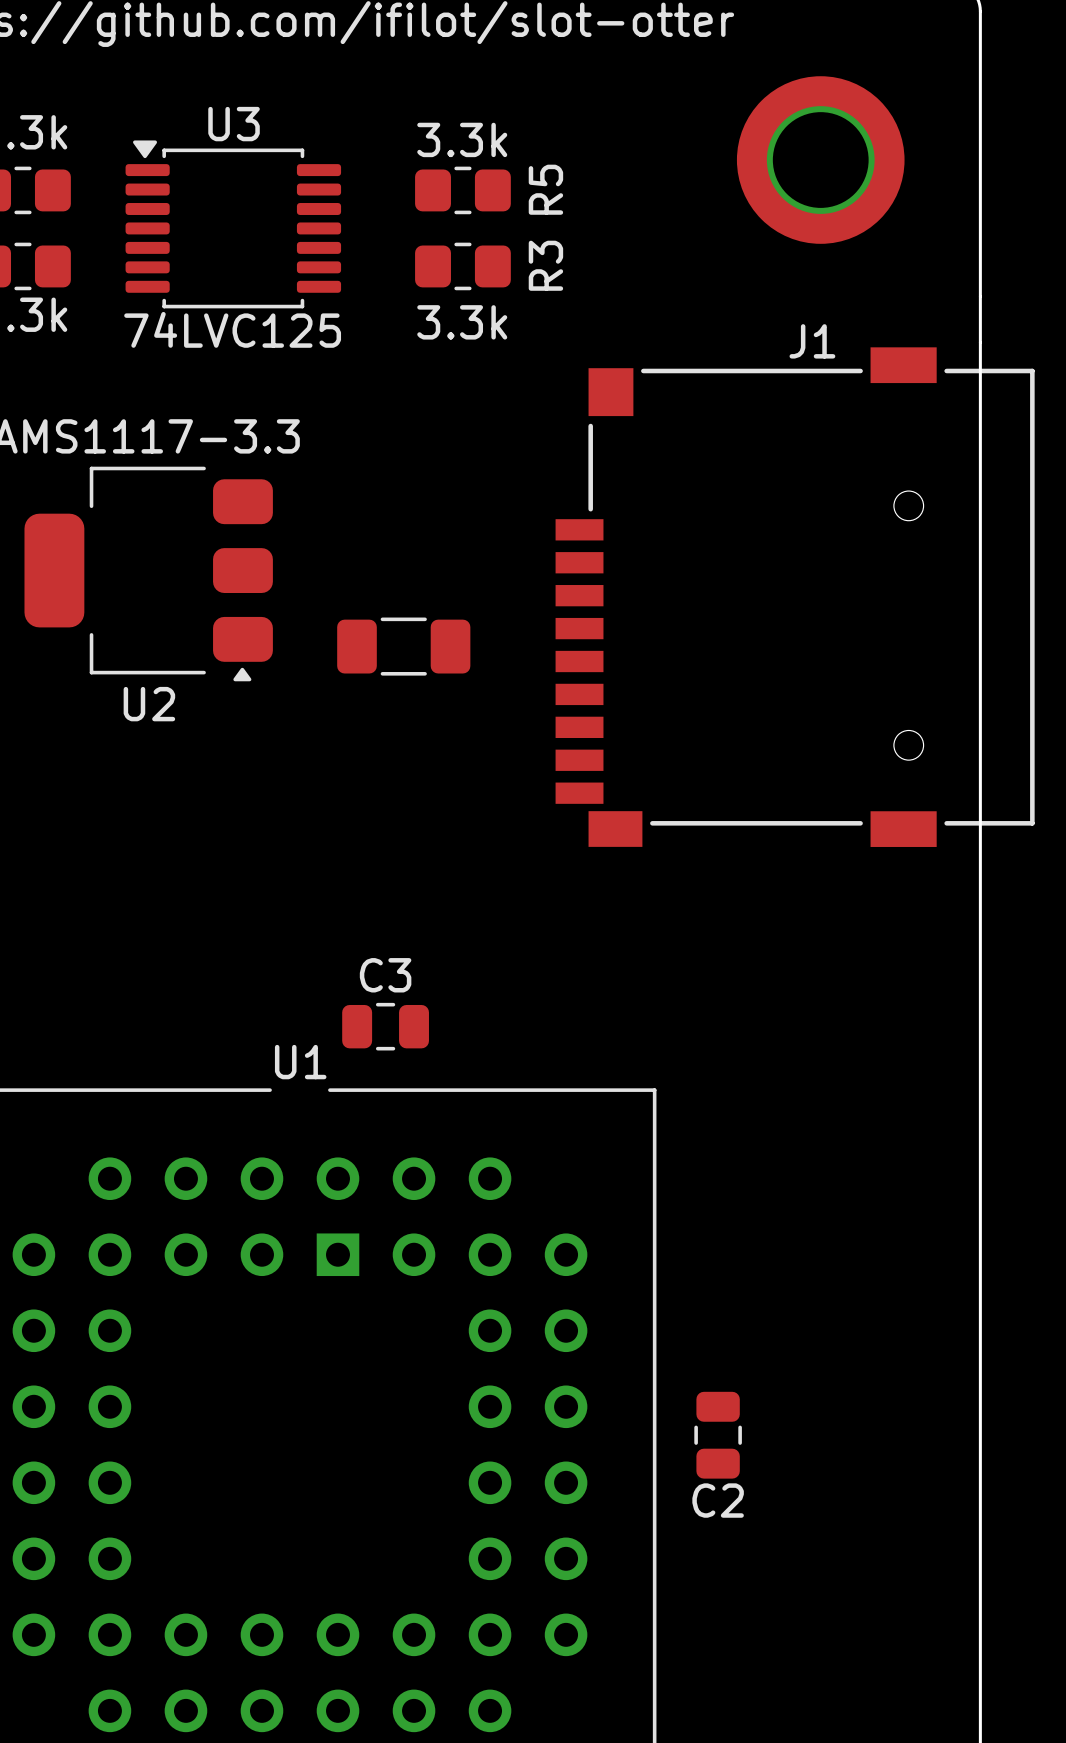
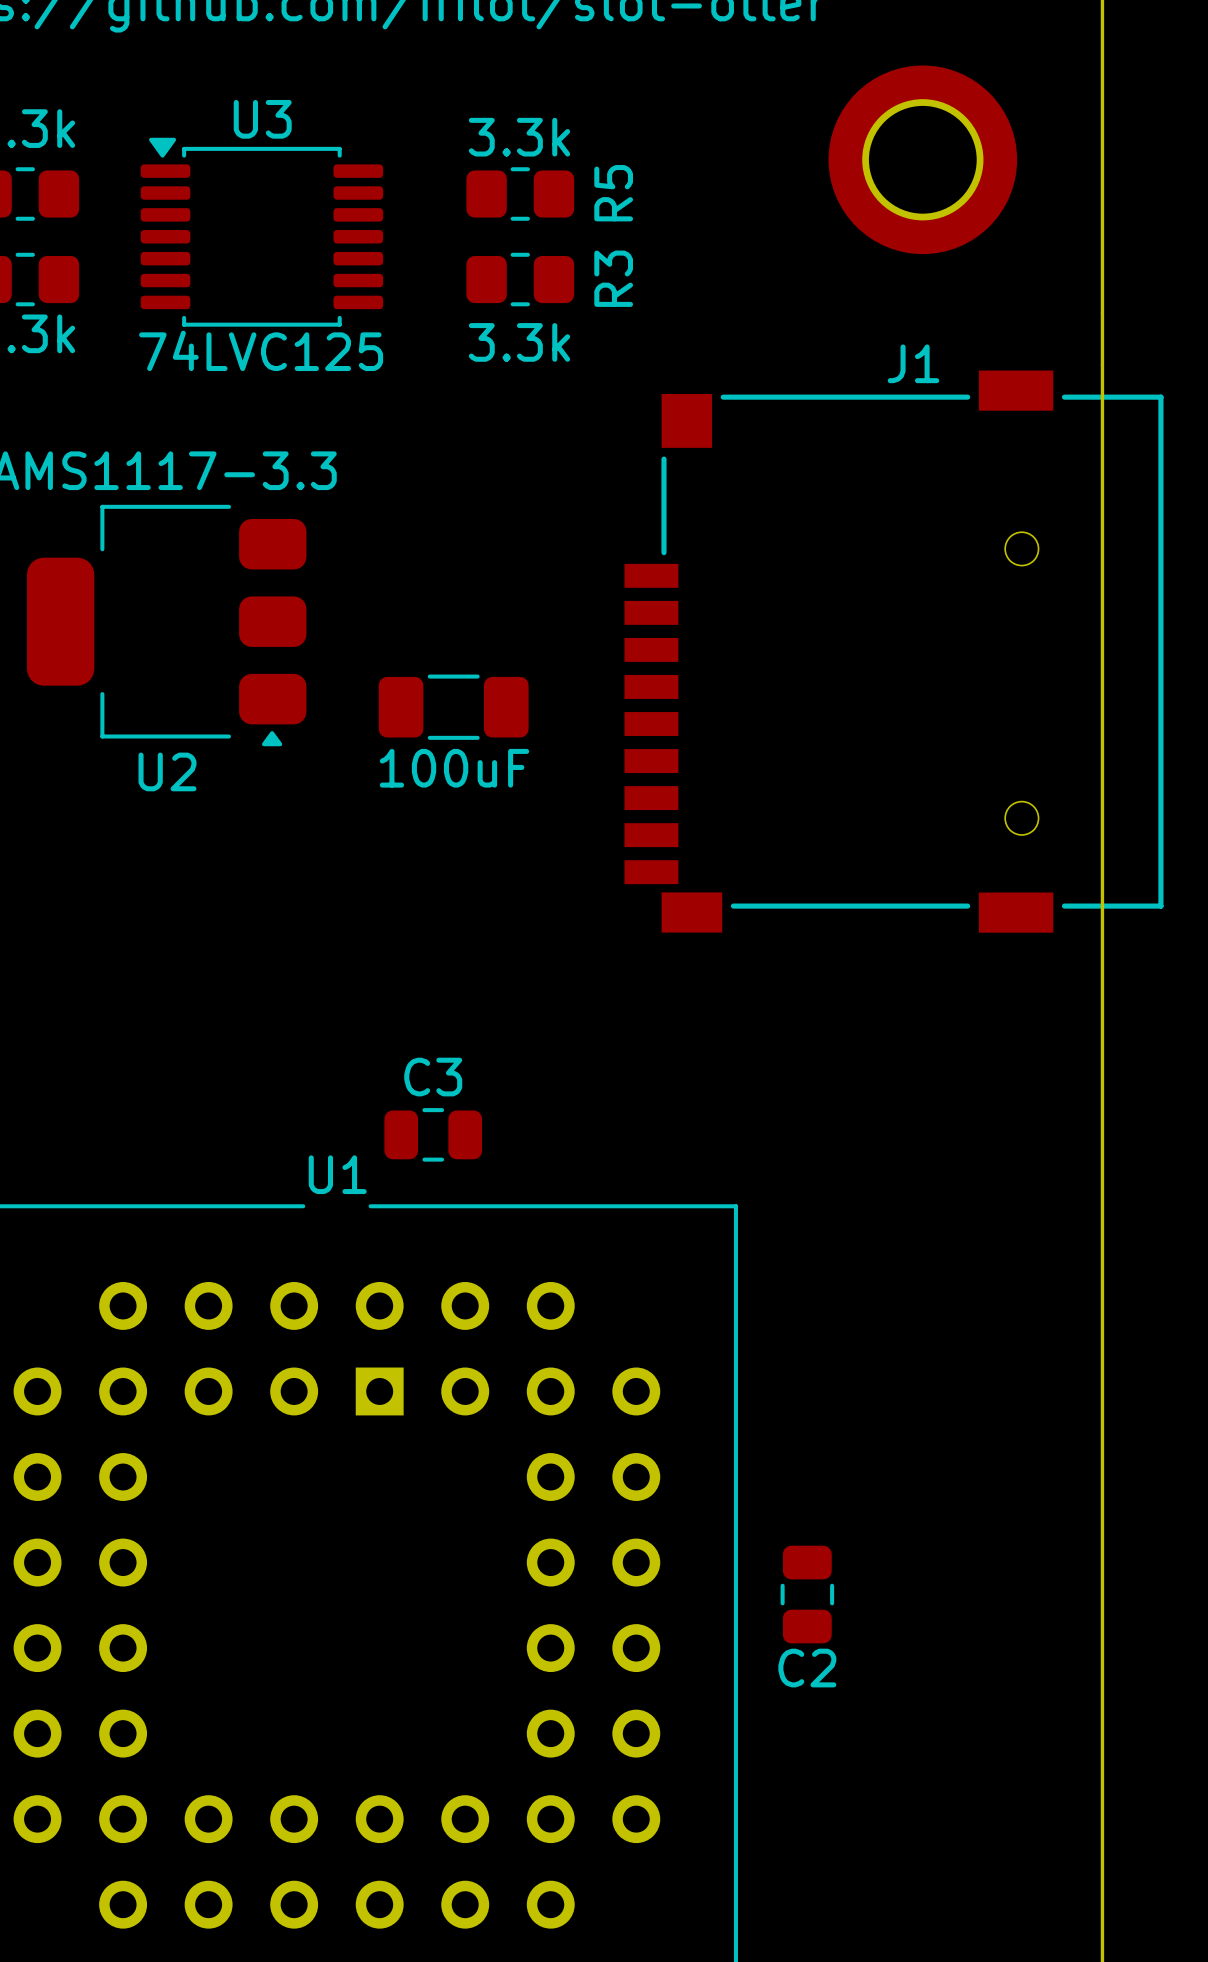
part value: none -> 100uF (454, 768)

